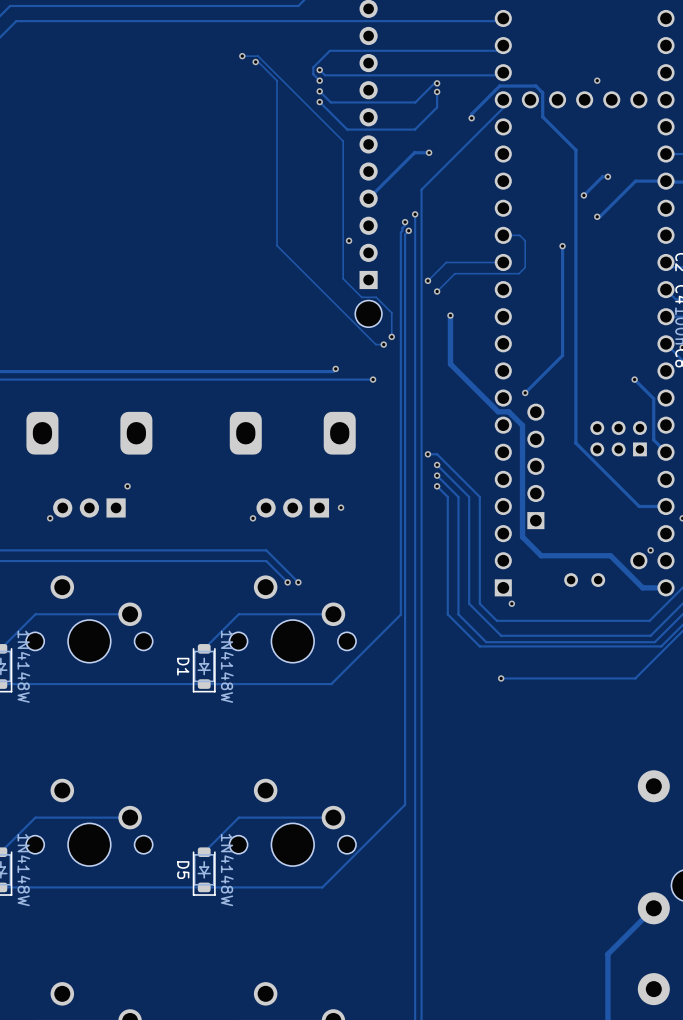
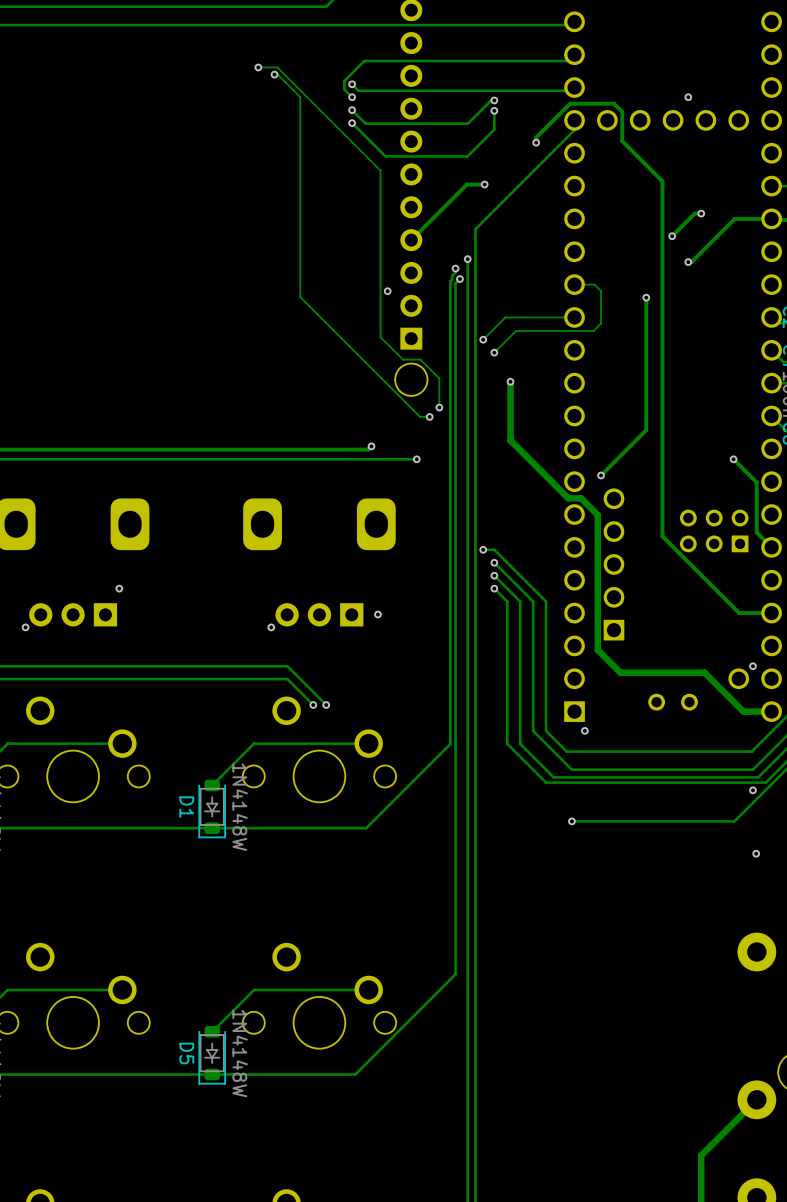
via: none -> (752, 790)
via: none -> (756, 853)

